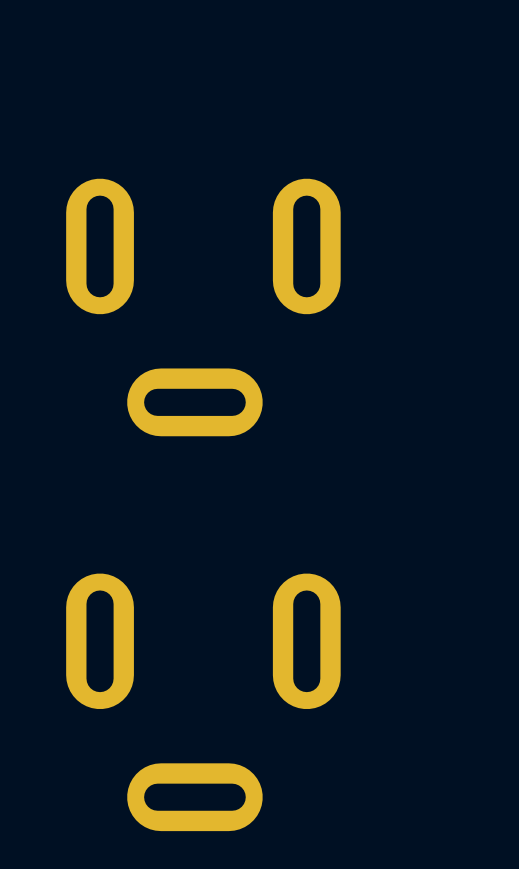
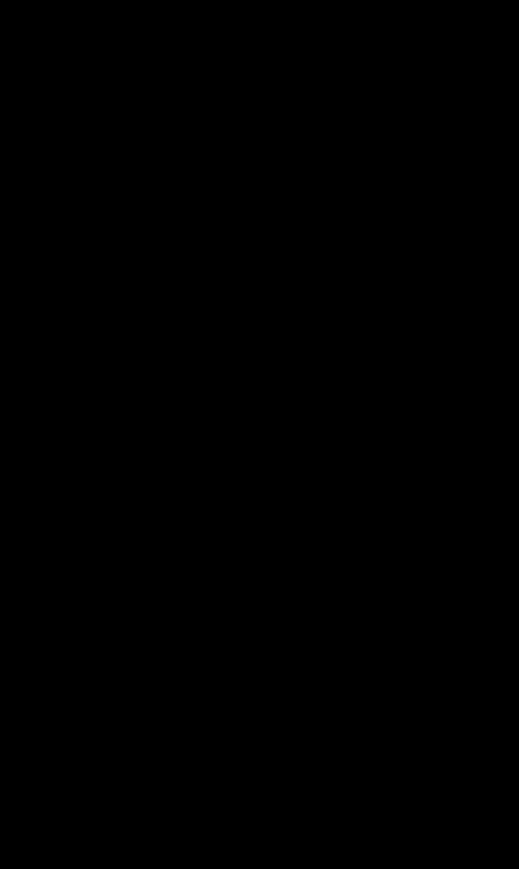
part: (203, 307) -> none
part: (203, 702) -> none

